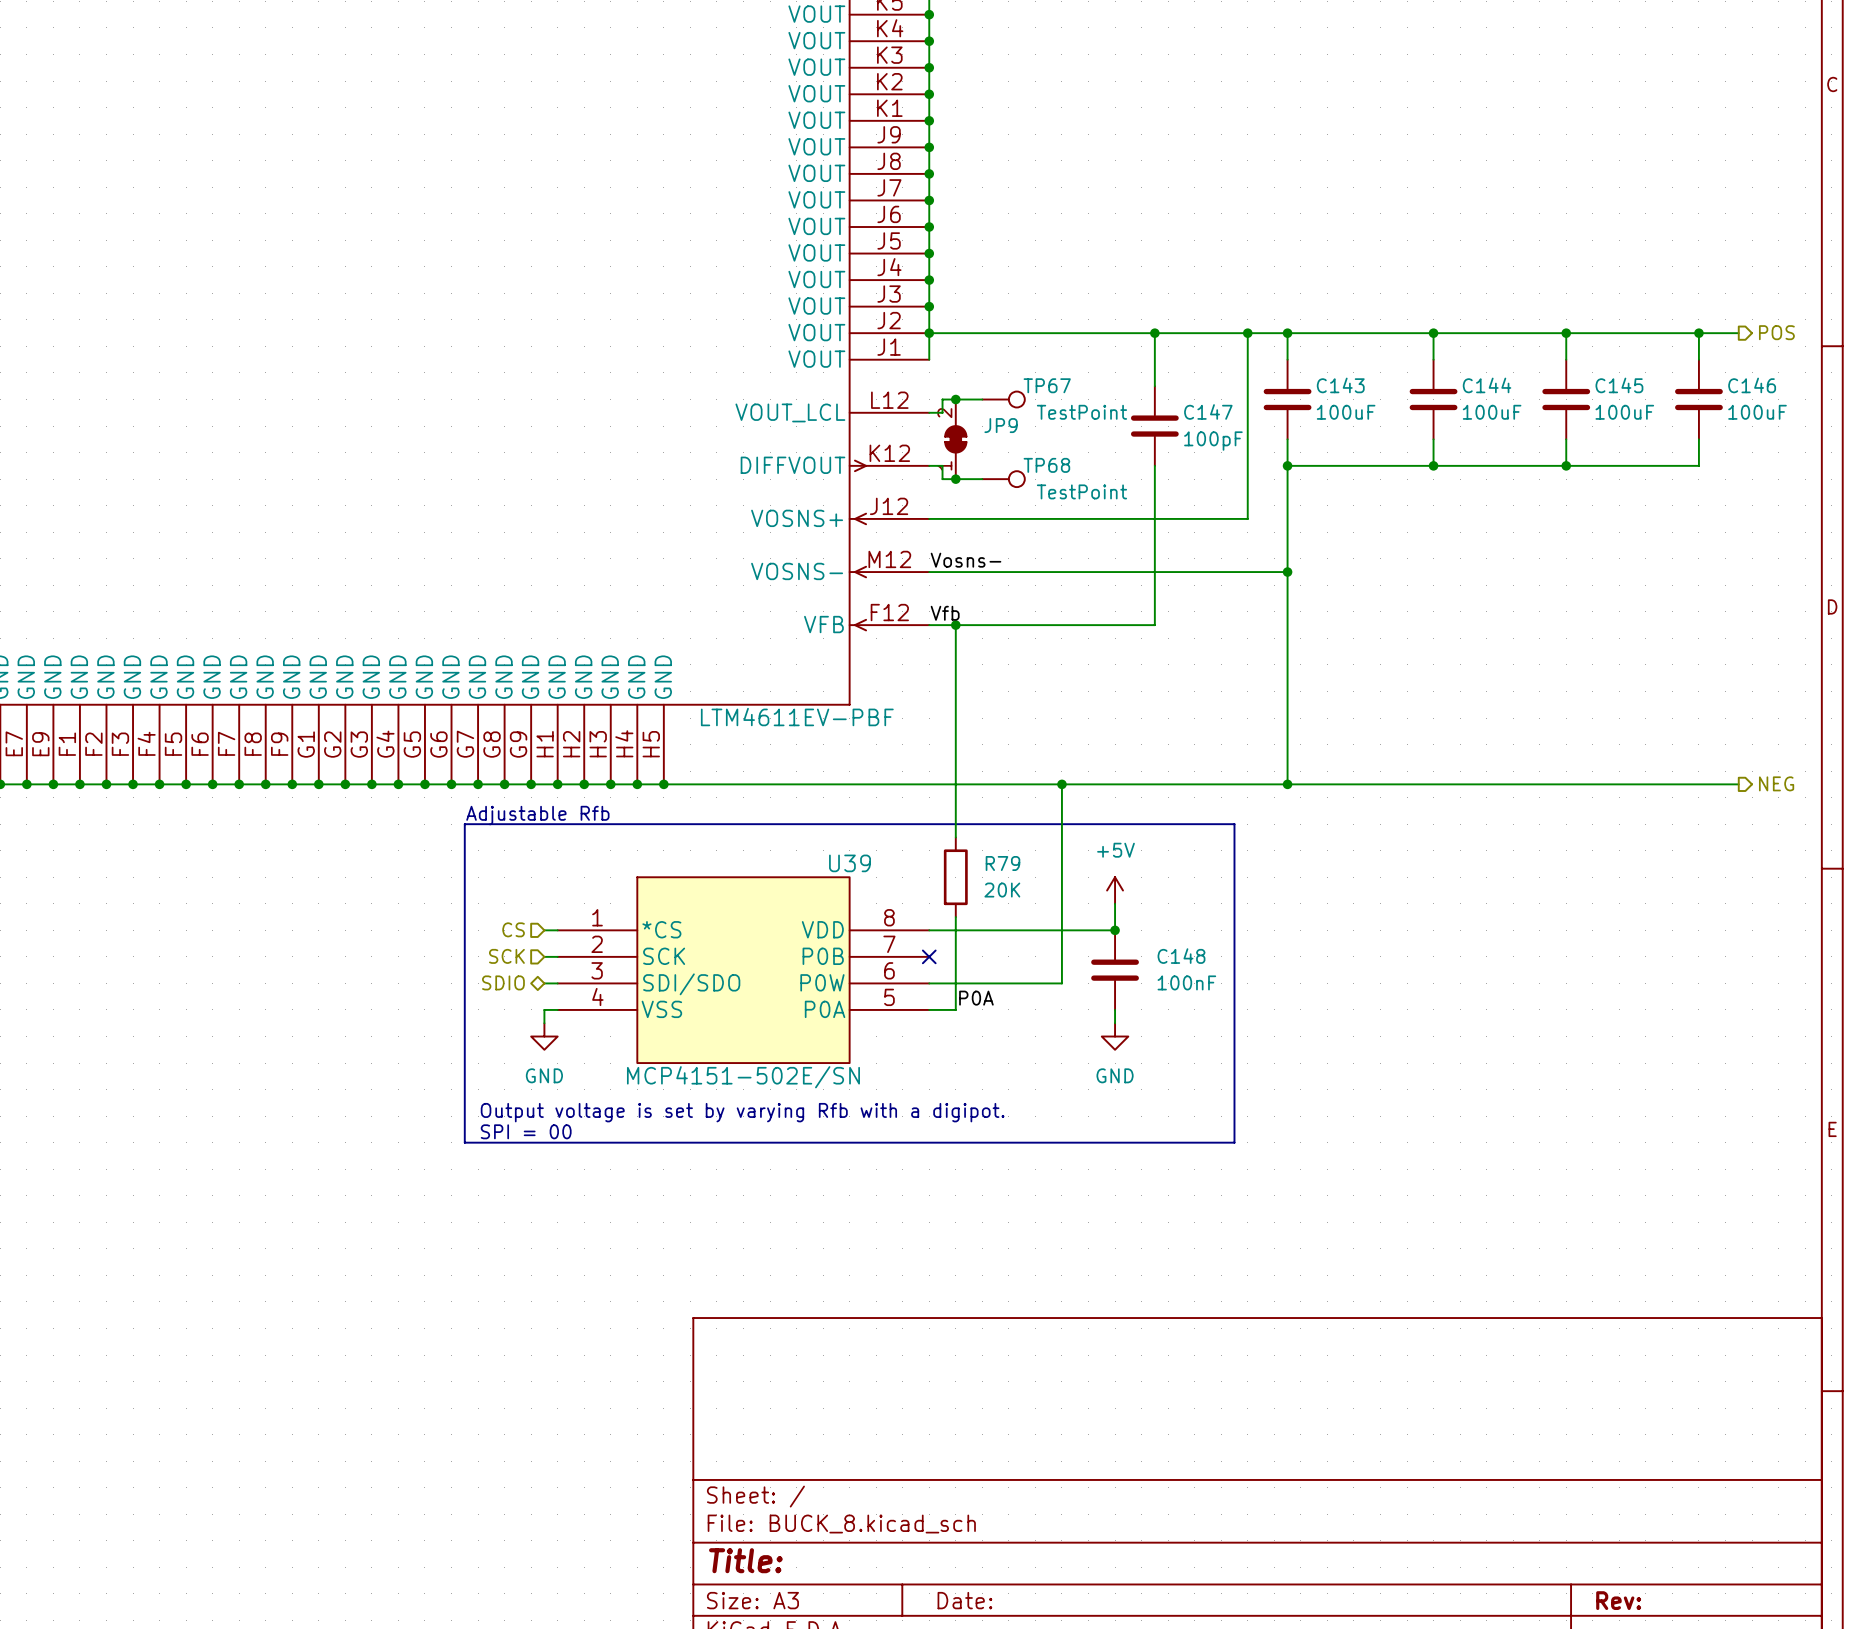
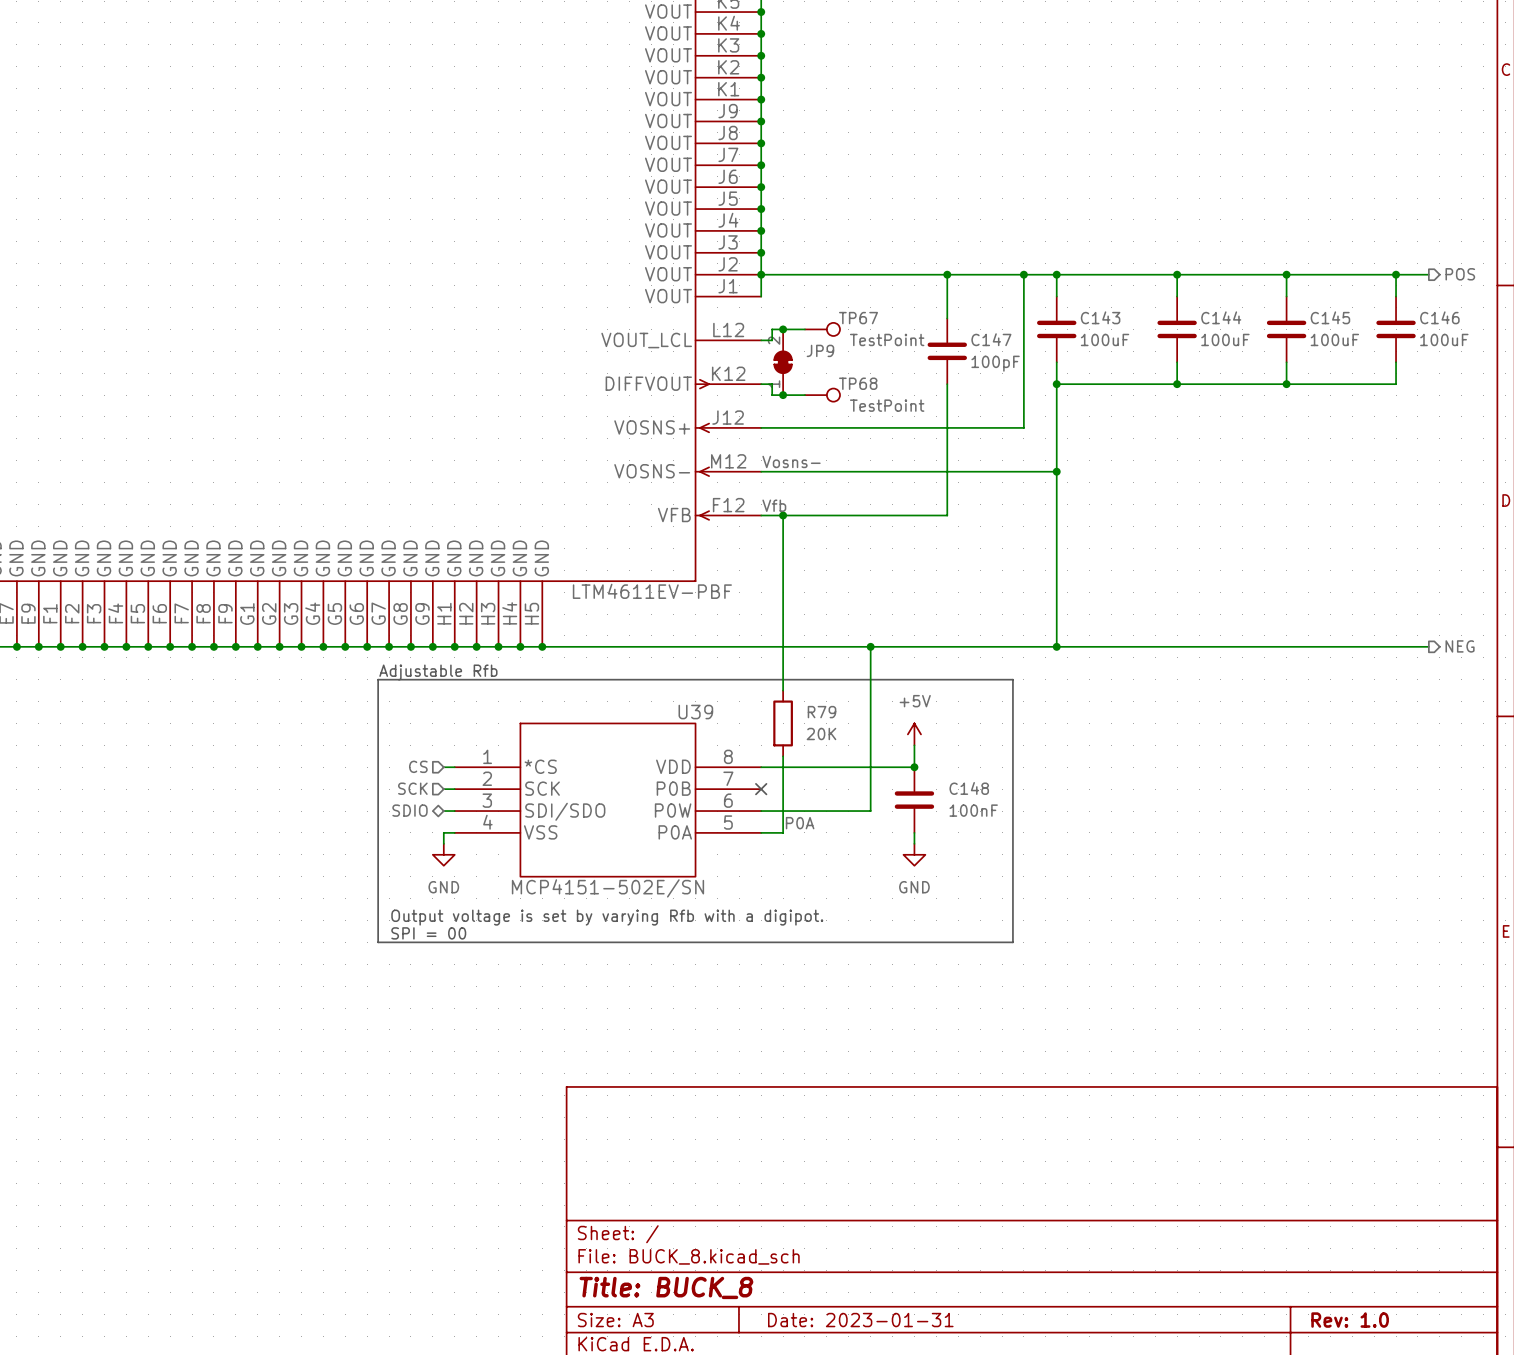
title block: Title: (745, 1560) -> Title: BUCK_8 (666, 1287)
title block: Date: (964, 1600) -> Date: 2023-01-31 (860, 1320)
title block: Rev: (1618, 1600) -> Rev: 1.0 (1350, 1320)

